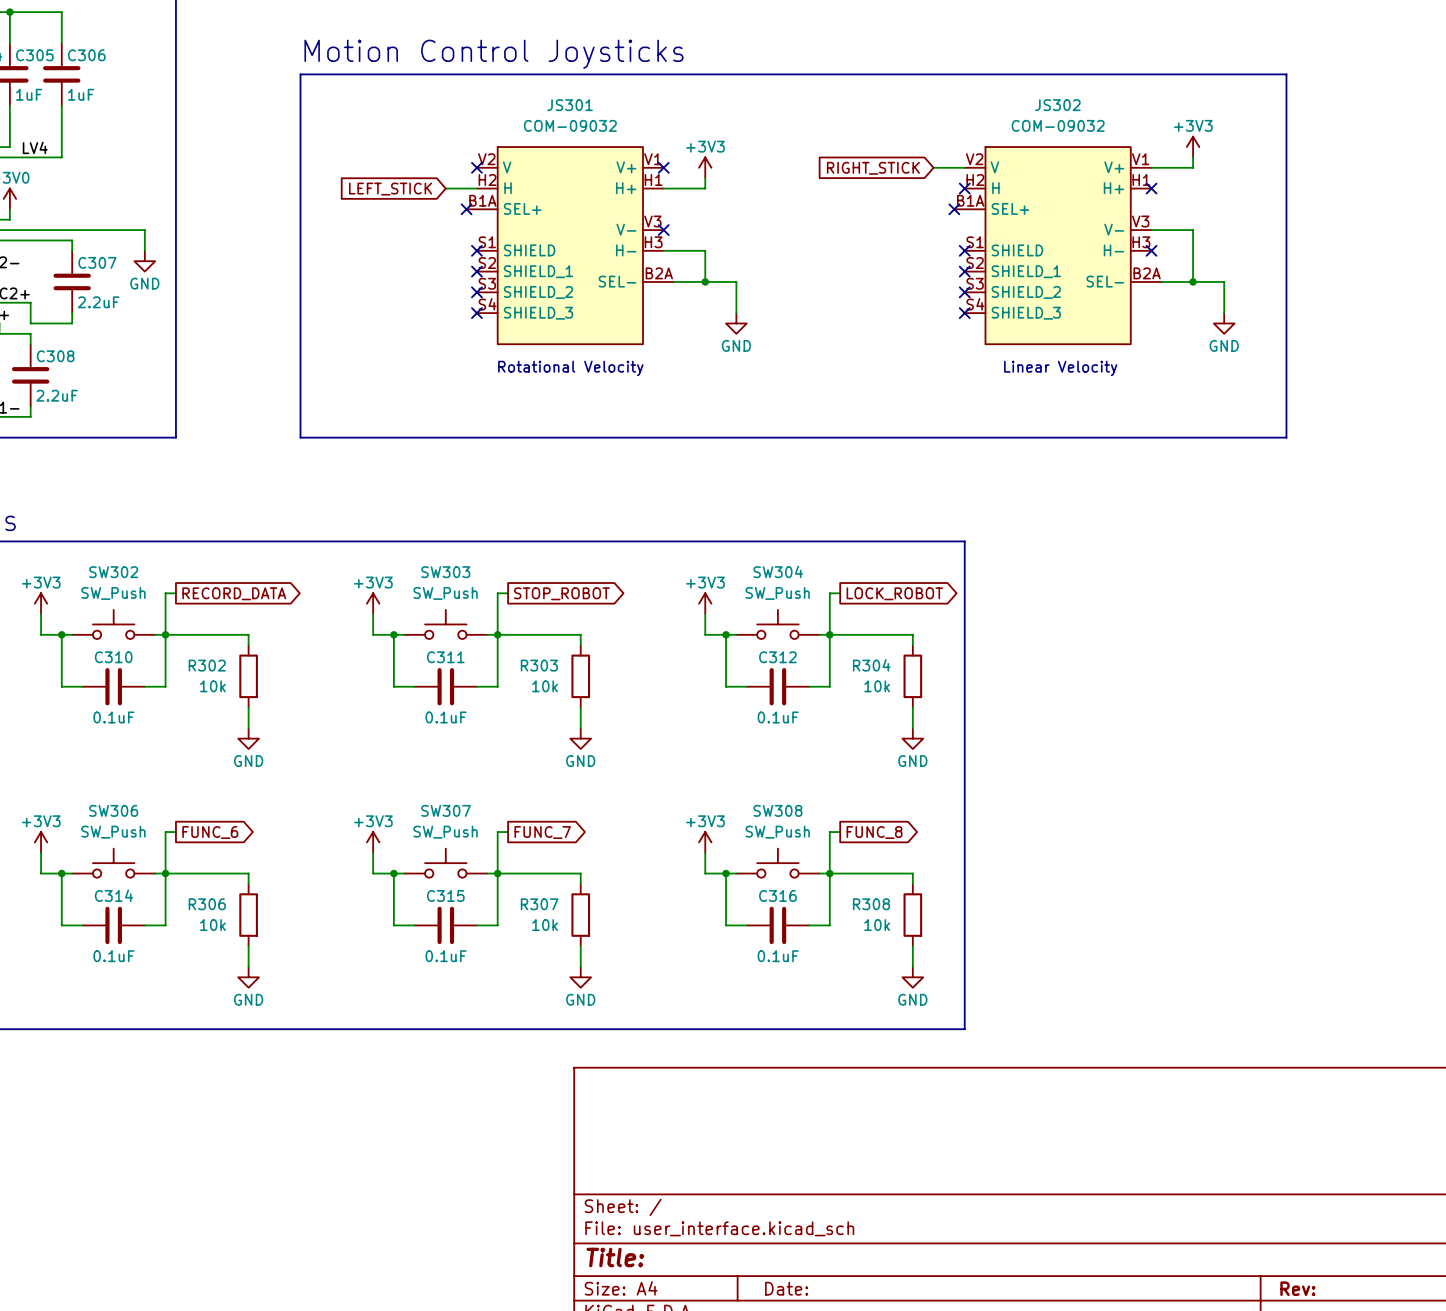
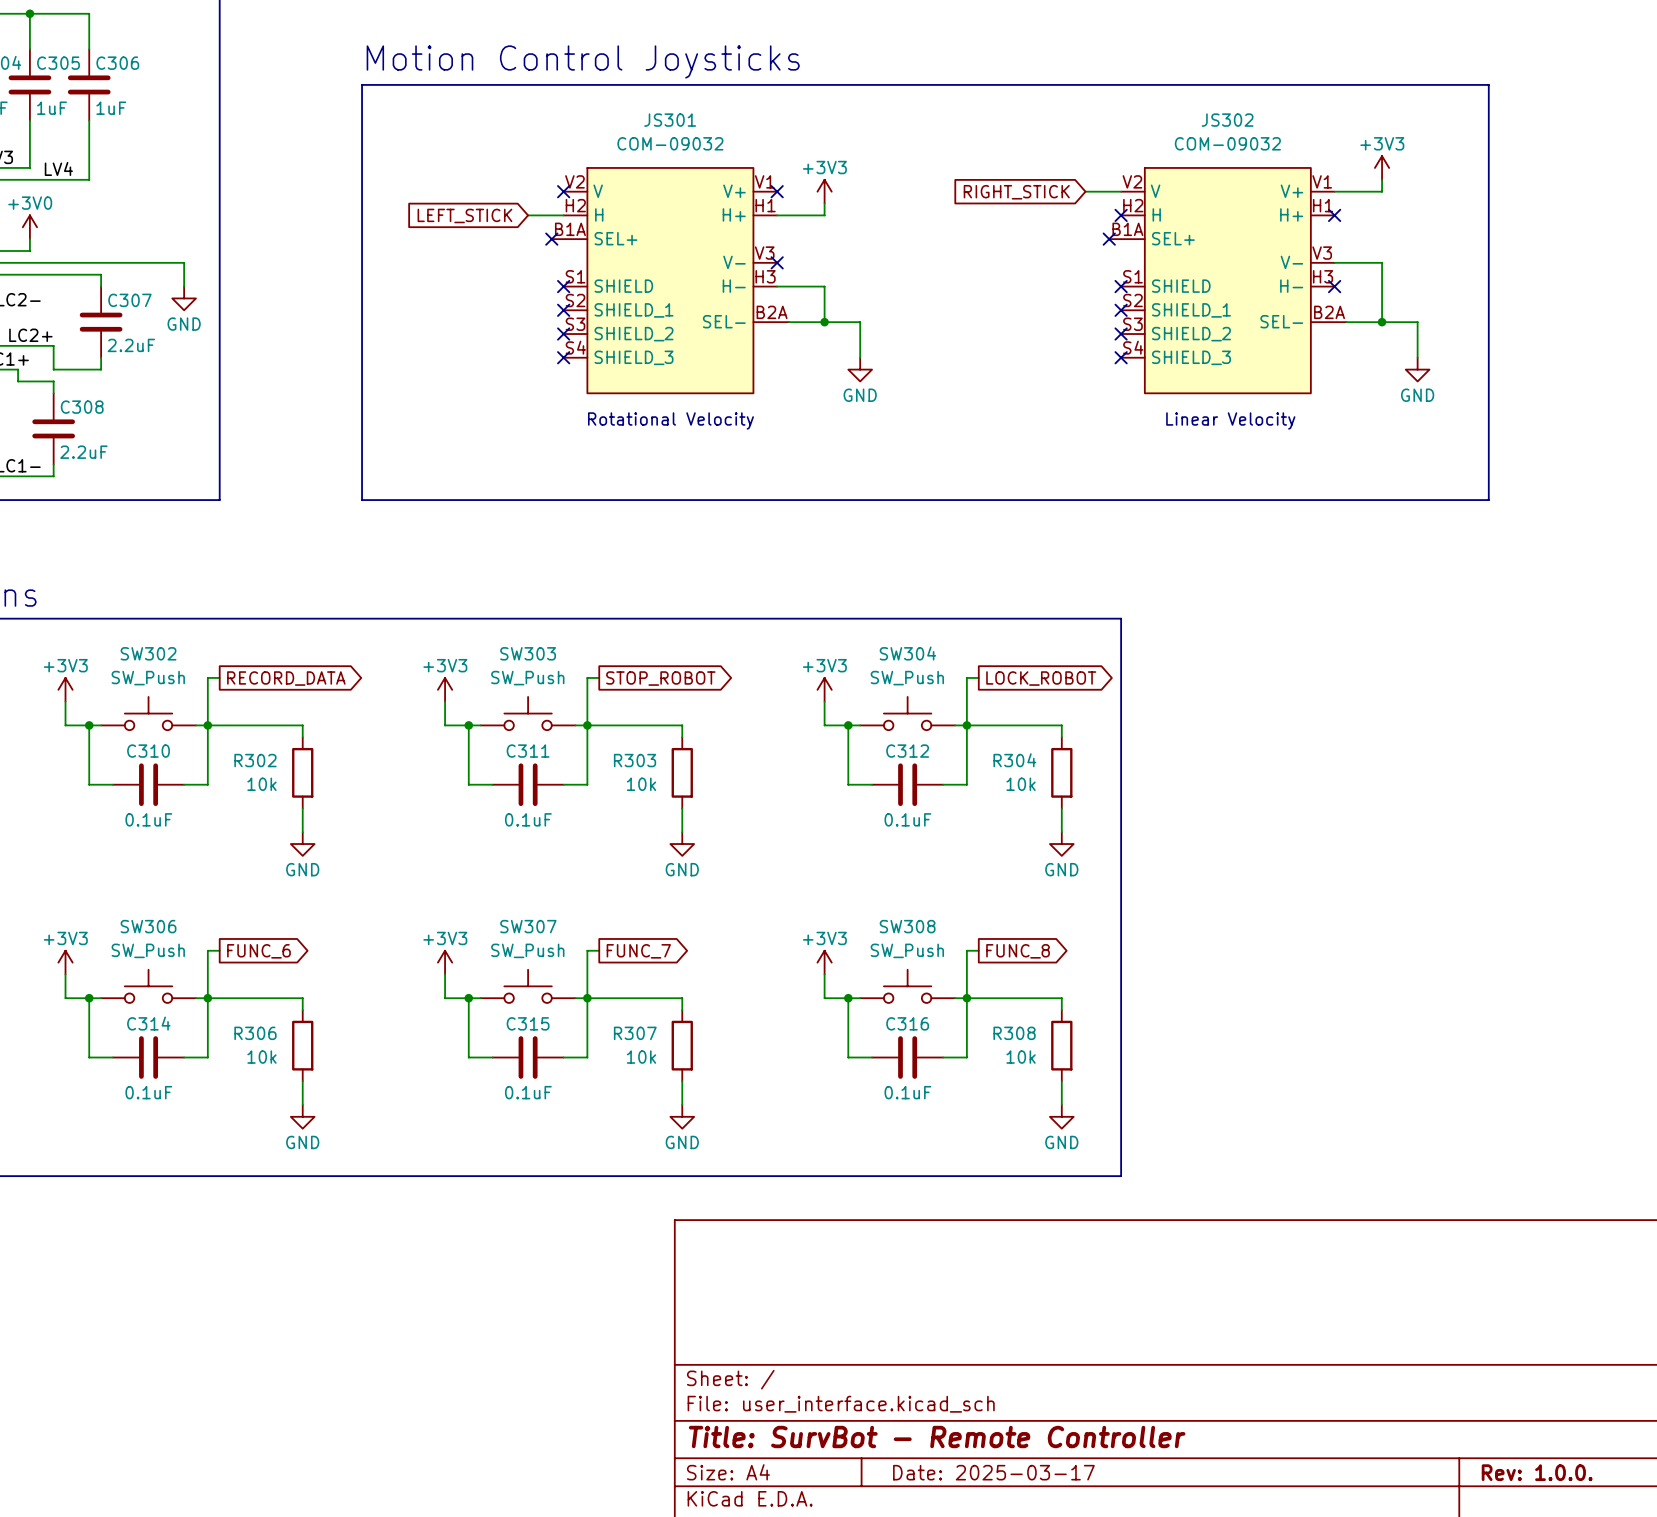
title block: Title: (615, 1257) -> Title: SurvBot - Remote Controller (937, 1437)
title block: Date: (786, 1288) -> Date: 2025-03-17 (993, 1472)
title block: Rev: (1297, 1288) -> Rev: 1.0.0. (1537, 1472)

